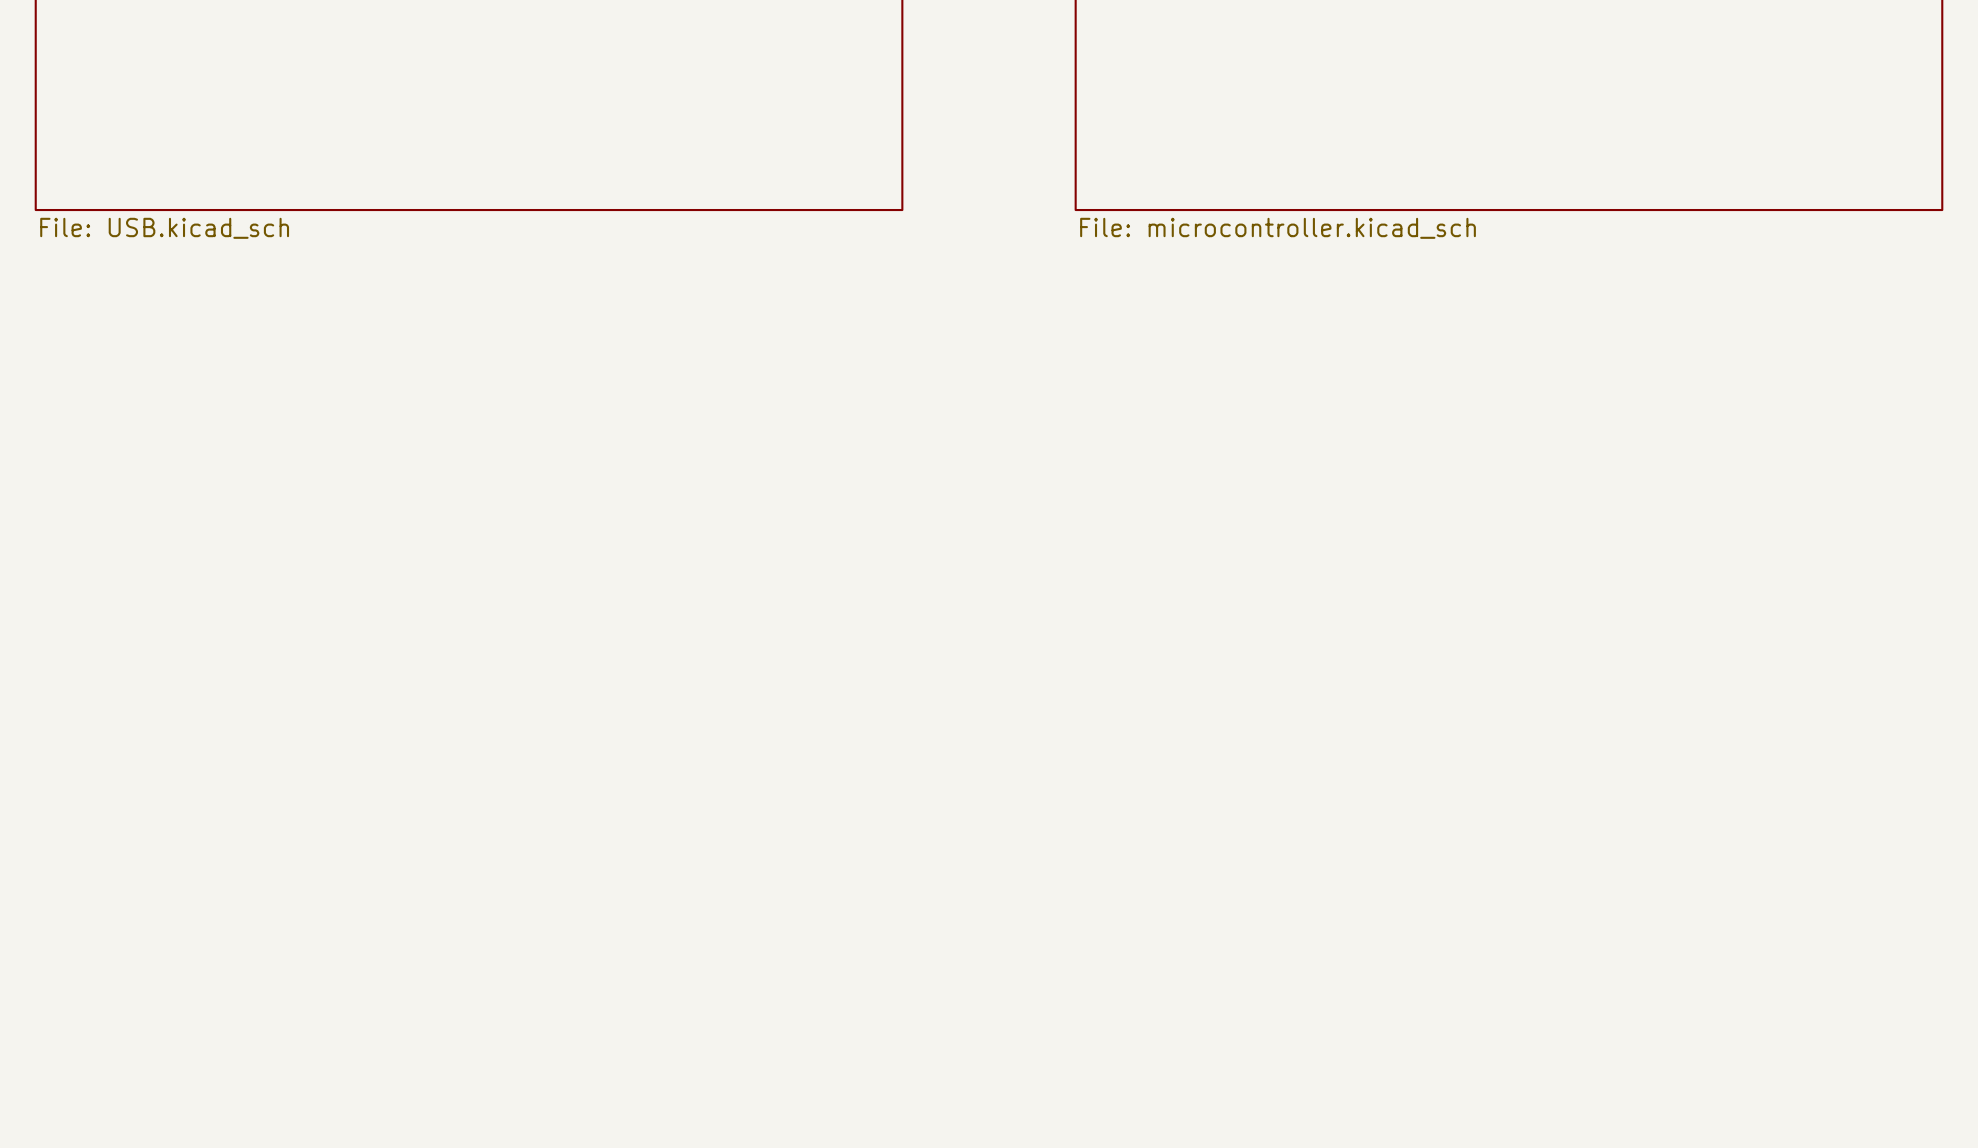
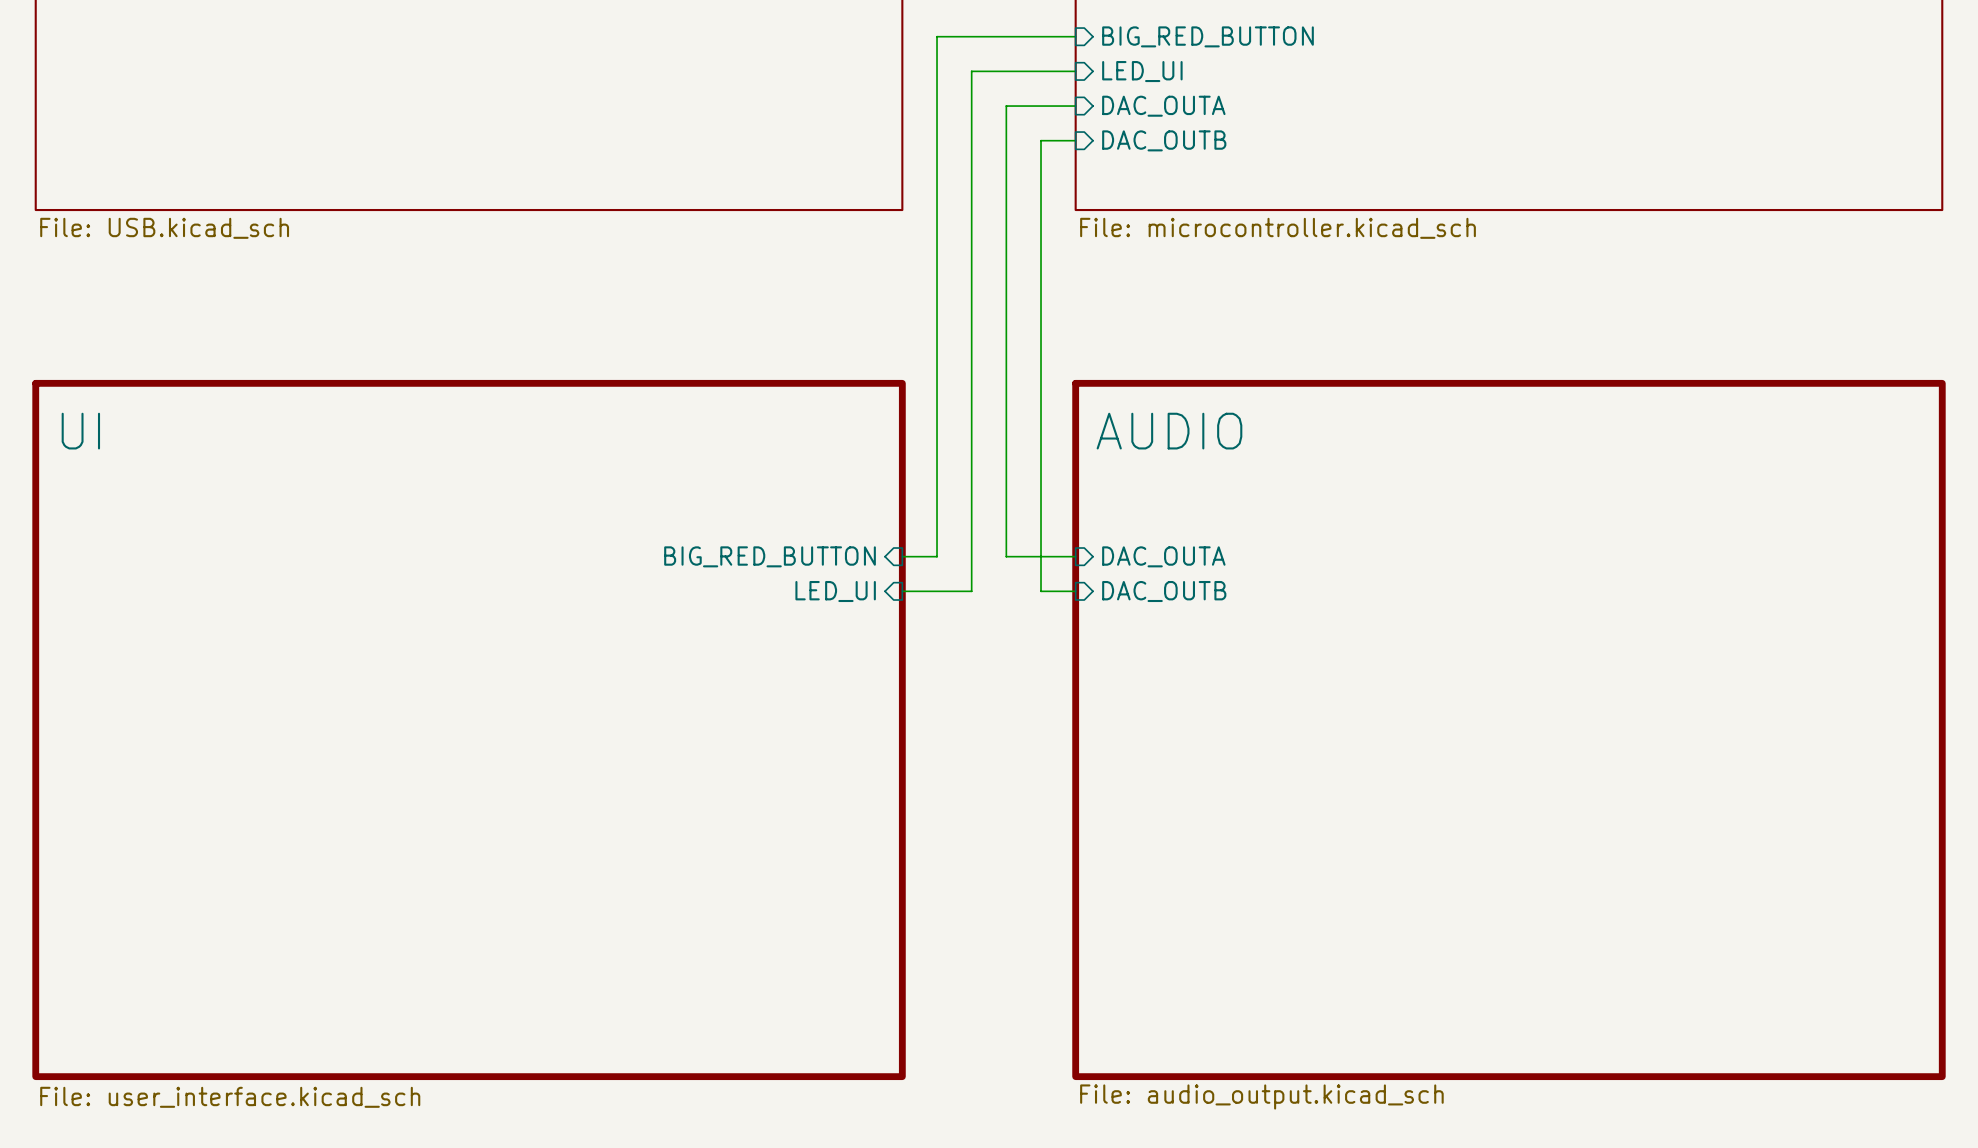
wire: none -> (1075, 36) (937, 36) (937, 556) (902, 556)
sheet pin: none -> BIG_RED_BUTTON (1207, 36)
wire: none -> (1075, 71) (971, 71) (971, 591) (902, 591)
sheet pin: none -> LED_UI (1142, 71)
wire: none -> (1075, 106) (1006, 106) (1006, 556) (1075, 556)
sheet pin: none -> DAC_OUTA (1163, 106)
wire: none -> (1075, 140) (1041, 140) (1041, 591) (1075, 591)
sheet pin: none -> DAC_OUTB (1164, 140)
sheet pin: none -> BIG_RED_BUTTON (770, 556)
sheet pin: none -> DAC_OUTA (1163, 556)
sheet pin: none -> LED_UI (835, 591)
sheet pin: none -> DAC_OUTB (1164, 591)
sheet UI: none -> File: user_interface.kicad_sch (469, 729)
sheet AUDIO: none -> File: audio_output.kicad_sch (1508, 729)

